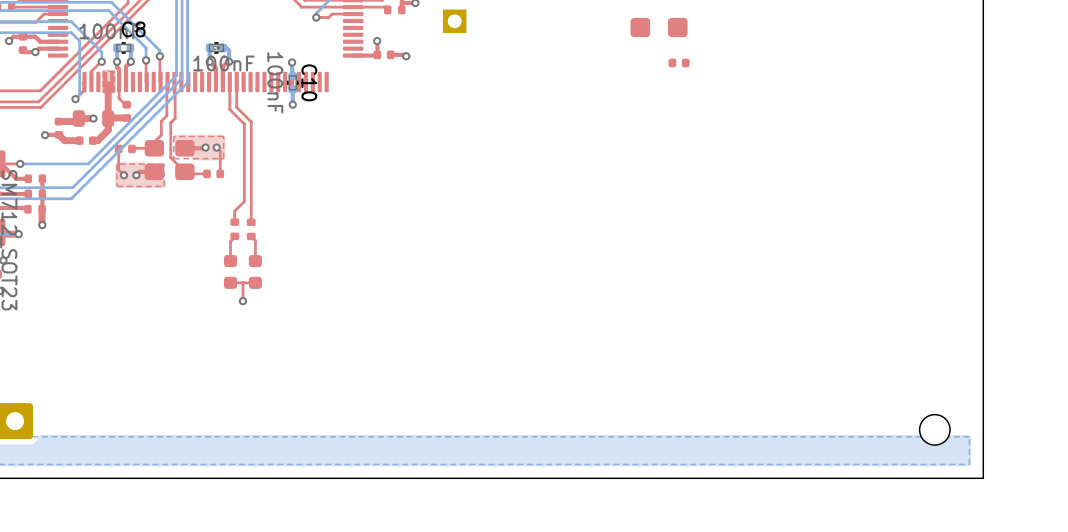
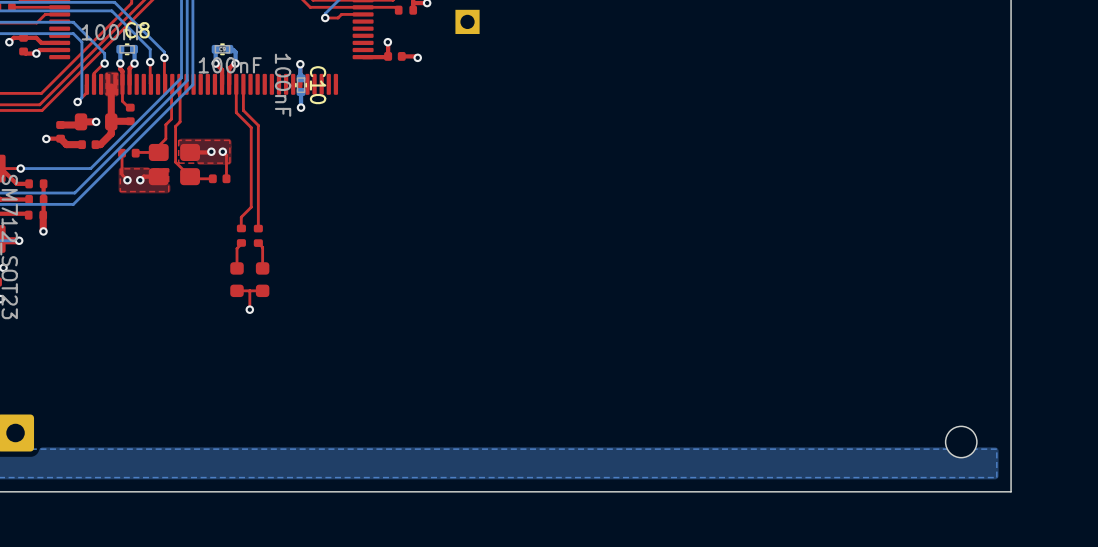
part: (659, 27) -> none
part: (679, 62) -> none

